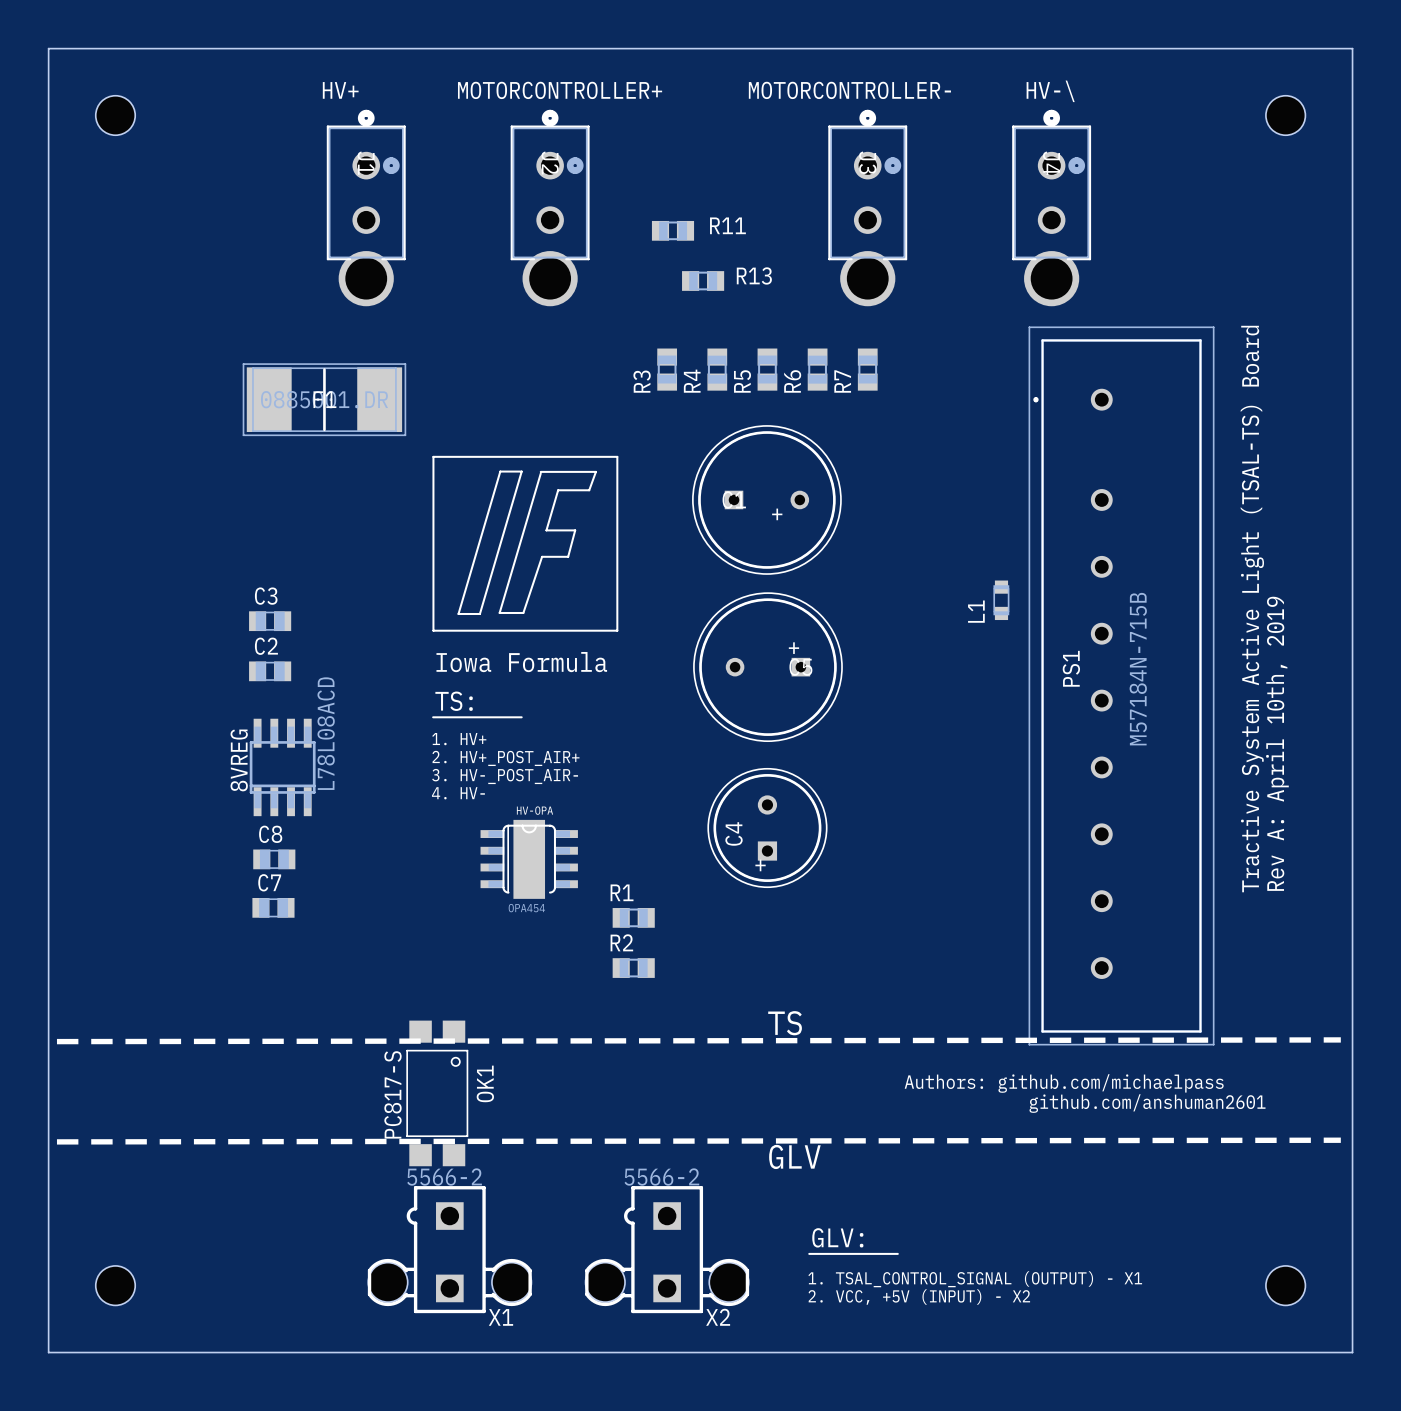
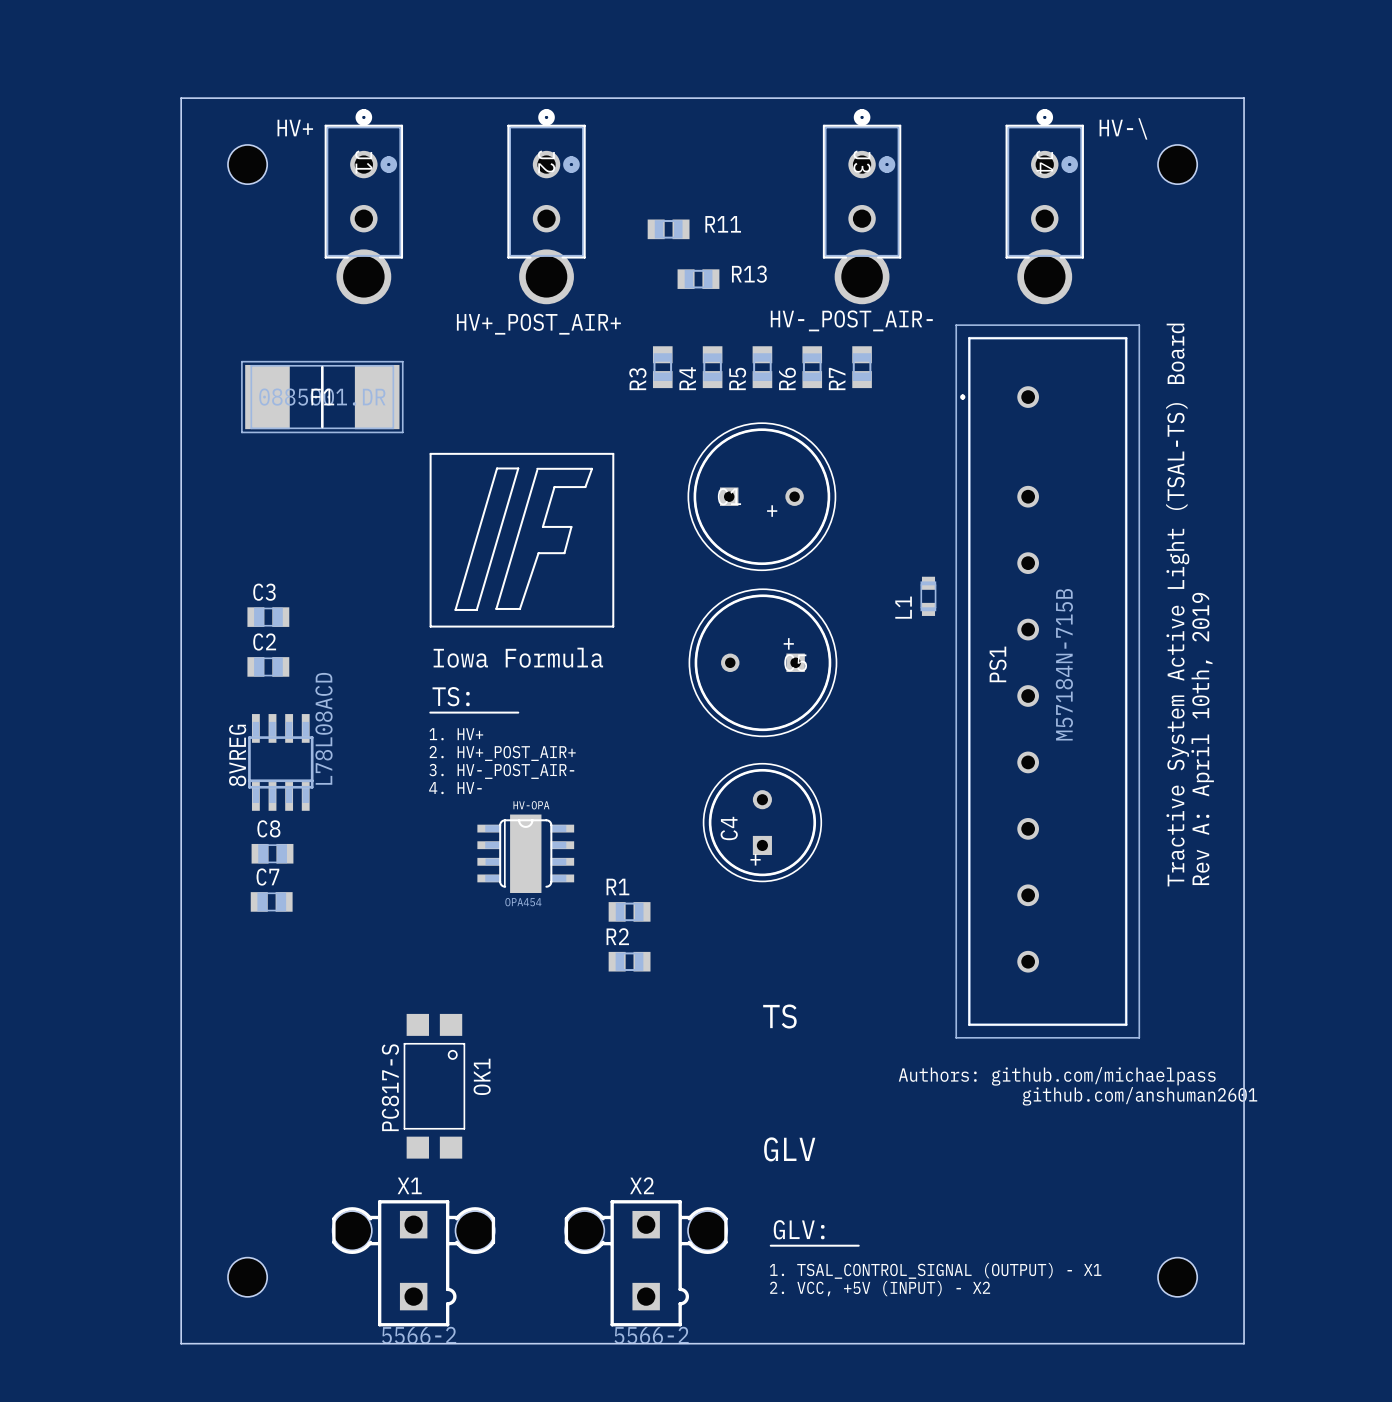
text position: HV+ (340, 90) -> HV+ (295, 128)
text: MOTORCONTROLLER+ (560, 90) -> none
text: MOTORCONTROLLER- (849, 90) -> none
text position: HV-\ (1050, 91) -> HV-\ (1123, 128)
hole position: (115, 115) -> (247, 164)
hole position: (1285, 115) -> (1177, 164)
text: none -> HV-_POST_AIR- (851, 320)
text: none -> HV+_POST_AIR+ (538, 324)
L1 position: (1001, 600) -> (928, 596)
text position: Tractive System Active Light (TSAL-TS) Board (1252, 609) -> Tractive System Active Light (TSAL-TS) Board (1177, 605)
PS1 position: (1121, 685) -> (1047, 681)
text position: Rev A: April 10th, 2019 (1277, 743) -> Rev A: April 10th, 2019 (1202, 738)
line: (1340, 1039) (56, 1041) -> none
line: (1340, 1140) (56, 1141) -> none
text position: GLV: (837, 1237) -> GLV: (799, 1229)
X1 rotation: 0° (449, 1249) -> 180° (413, 1263)
X2 rotation: 0° (667, 1249) -> 180° (646, 1263)
line: (864, 1253) (897, 1253) -> (770, 1245) (803, 1245)
text position: 1. TSAL_CONTROL_SIGNAL (OUTPUT) - X1 (975, 1279) -> 1. TSAL_CONTROL_SIGNAL (OUTPUT) - X1 (935, 1270)
hole position: (115, 1285) -> (247, 1277)
hole position: (1285, 1285) -> (1177, 1277)
text position: 2. VCC, +5V (INPUT) - X2 (919, 1297) -> 2. VCC, +5V (INPUT) - X2 (880, 1288)
X1 name position: X1 (500, 1317) -> X1 (409, 1185)
X2 name position: X2 (718, 1317) -> X2 (642, 1185)
board edge: (182, 1352) (48, 1352) (48, 48) (1352, 48) (1352, 1352) (1252, 1352) -> (181, 1343) (181, 98) (1244, 98) (1244, 1343)

